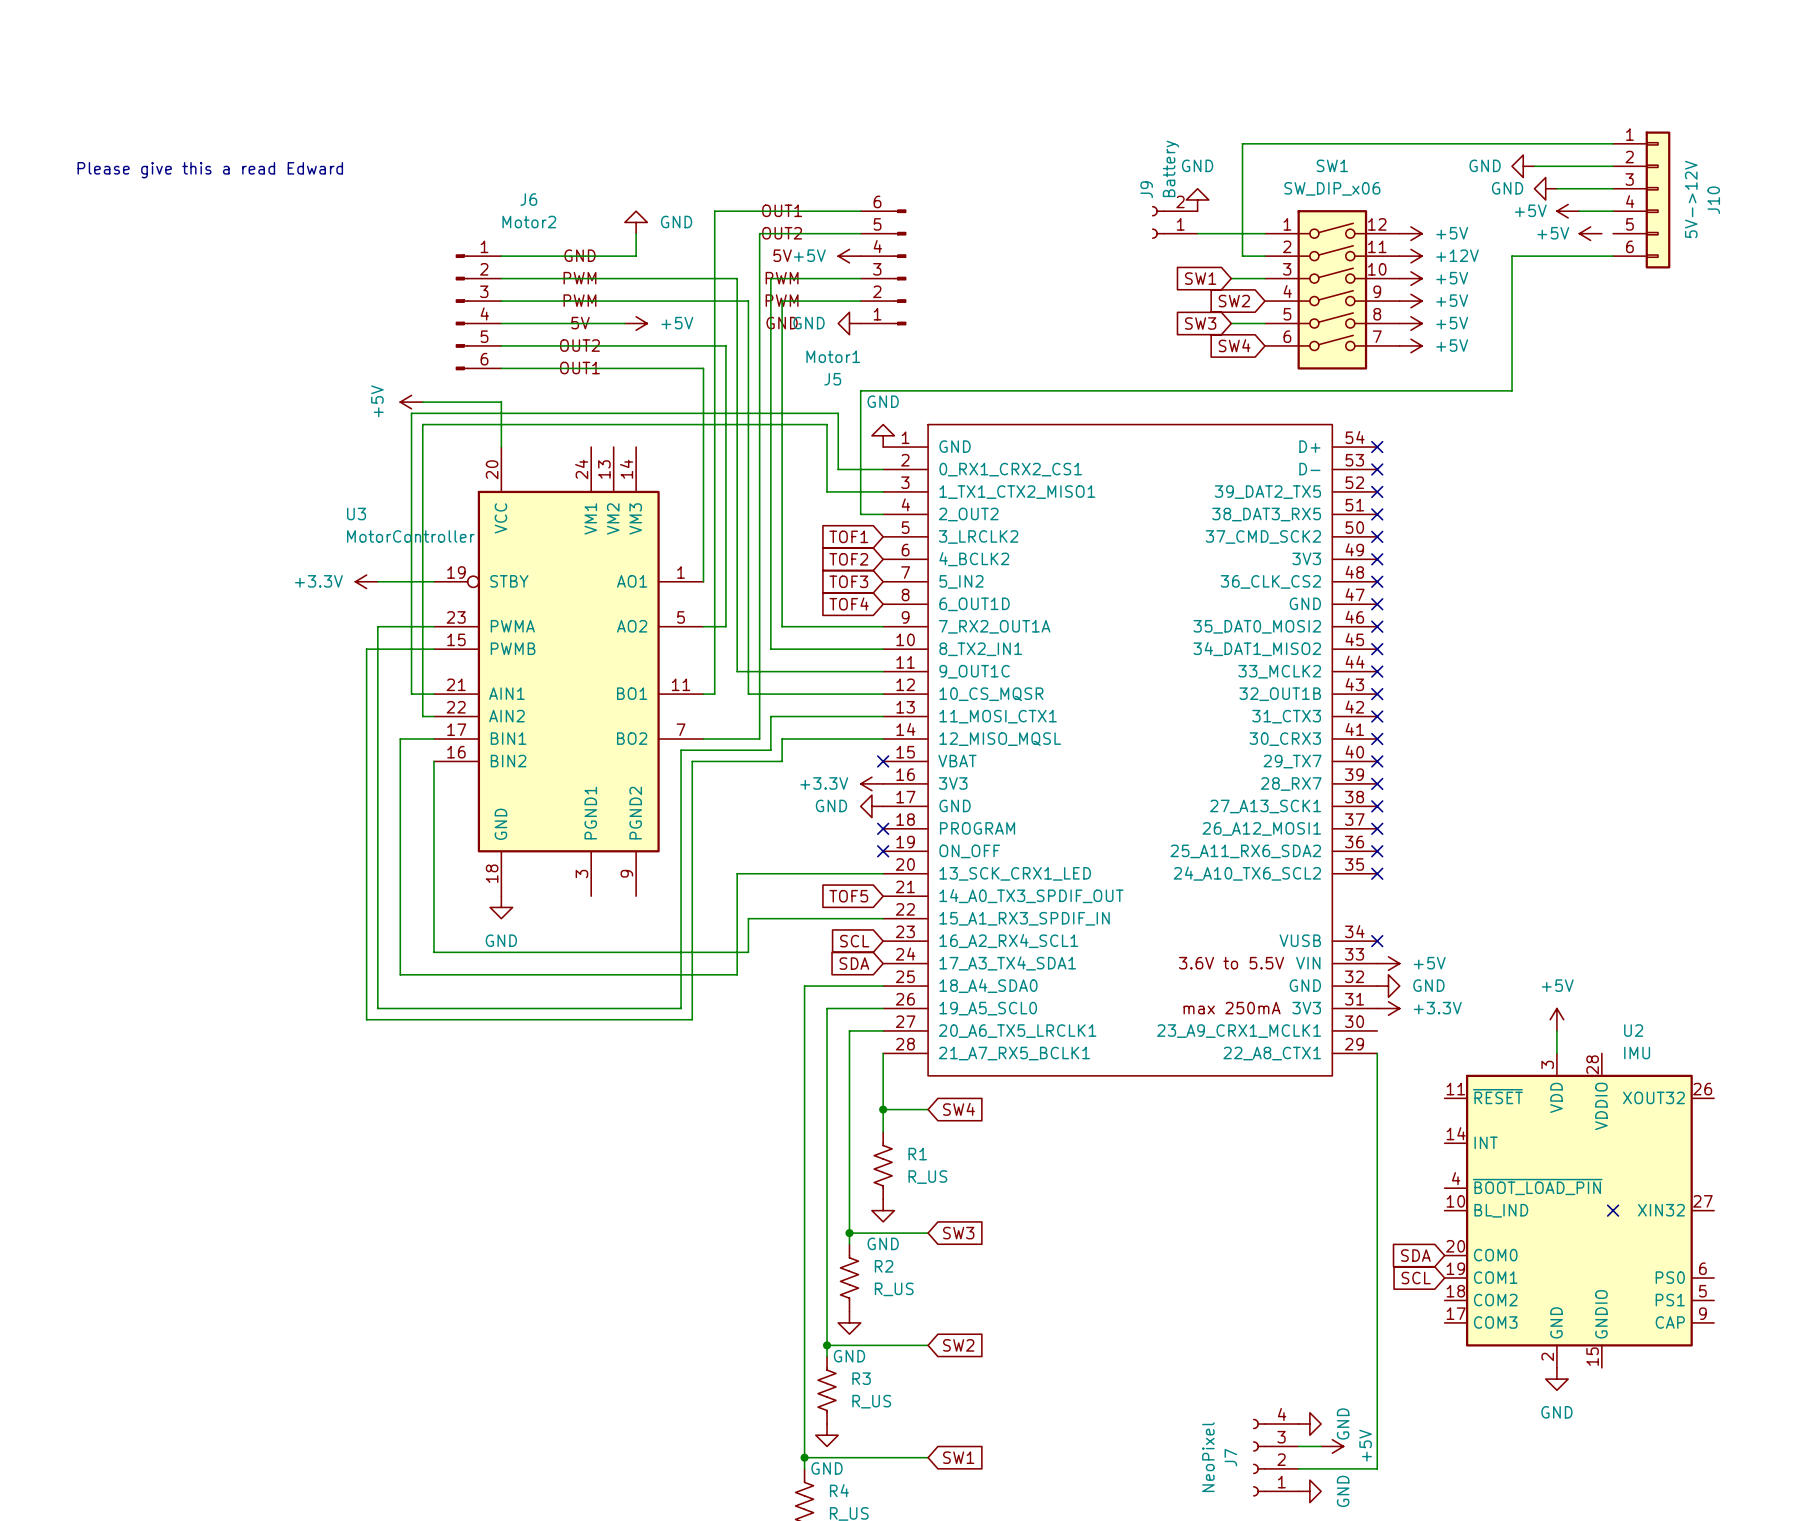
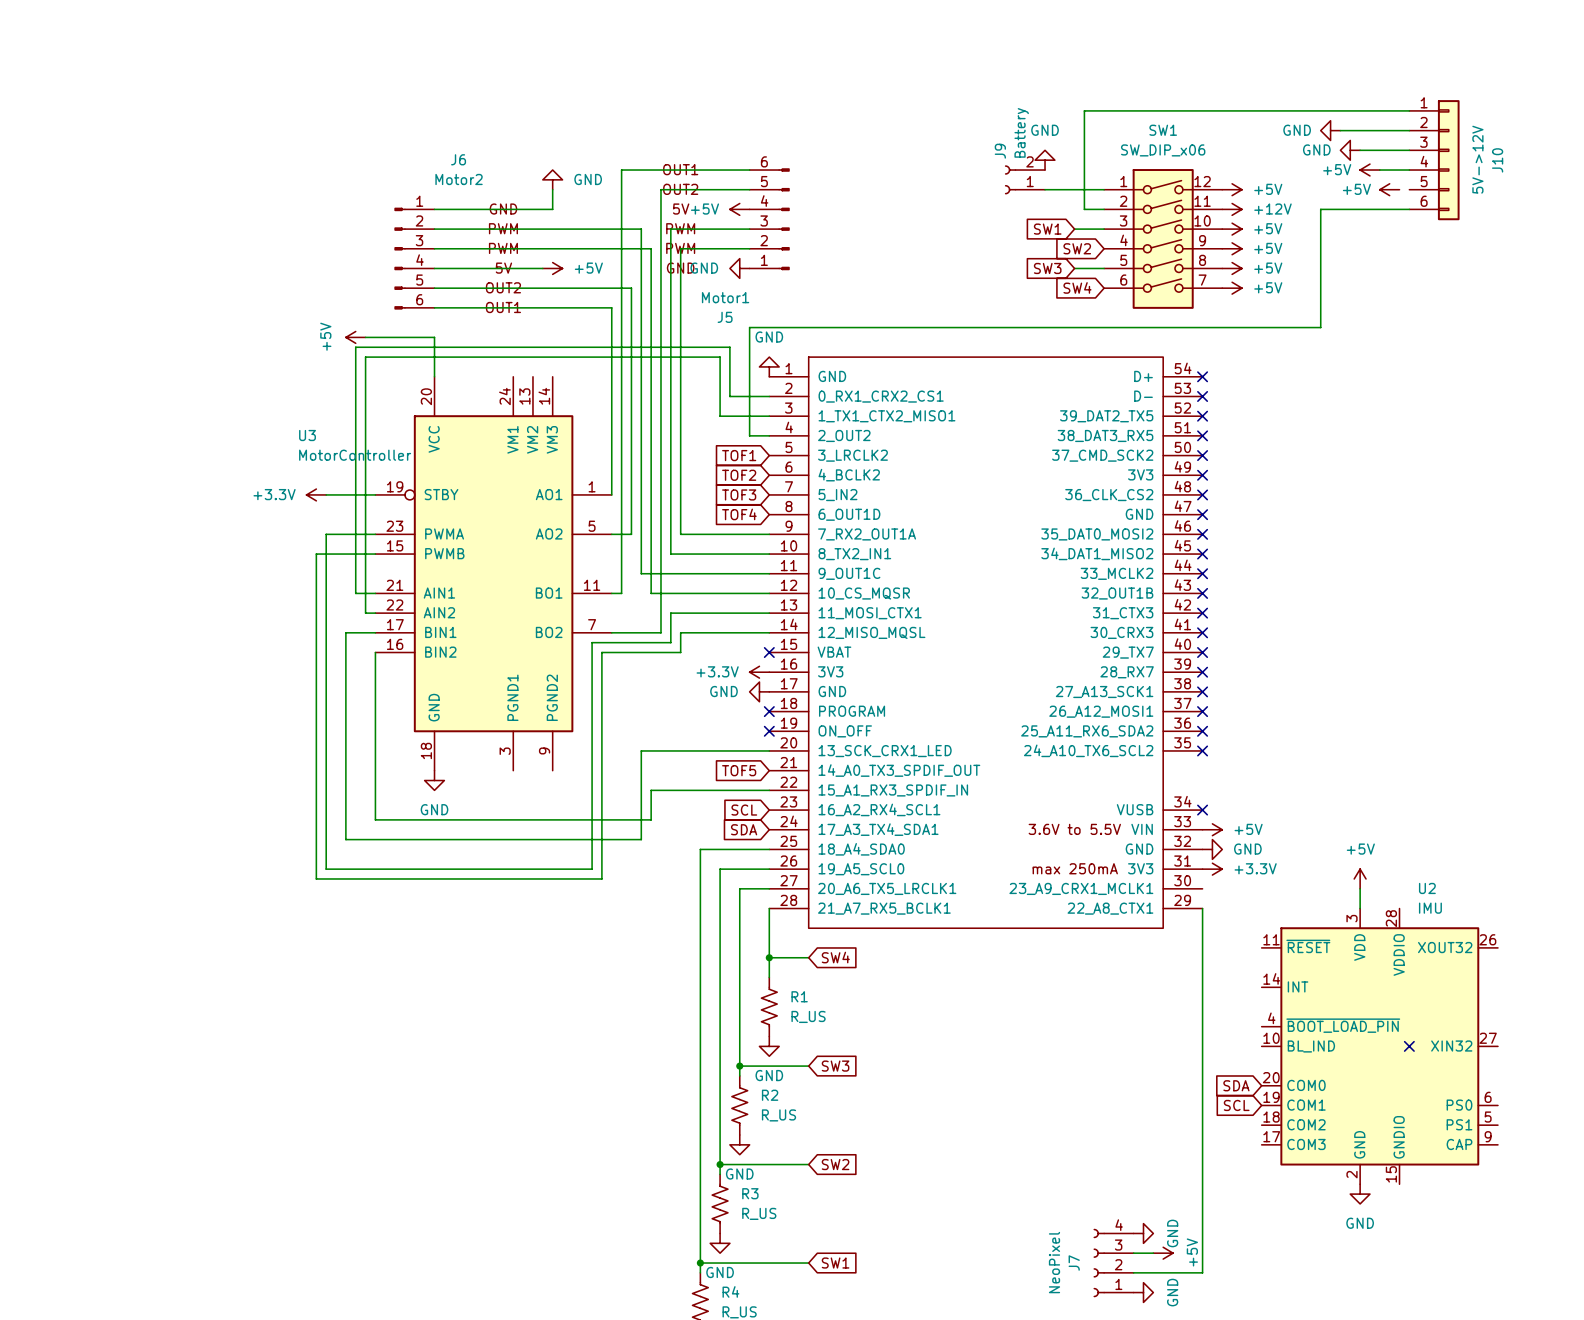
text: Please give this a read Edward (210, 170) -> none

